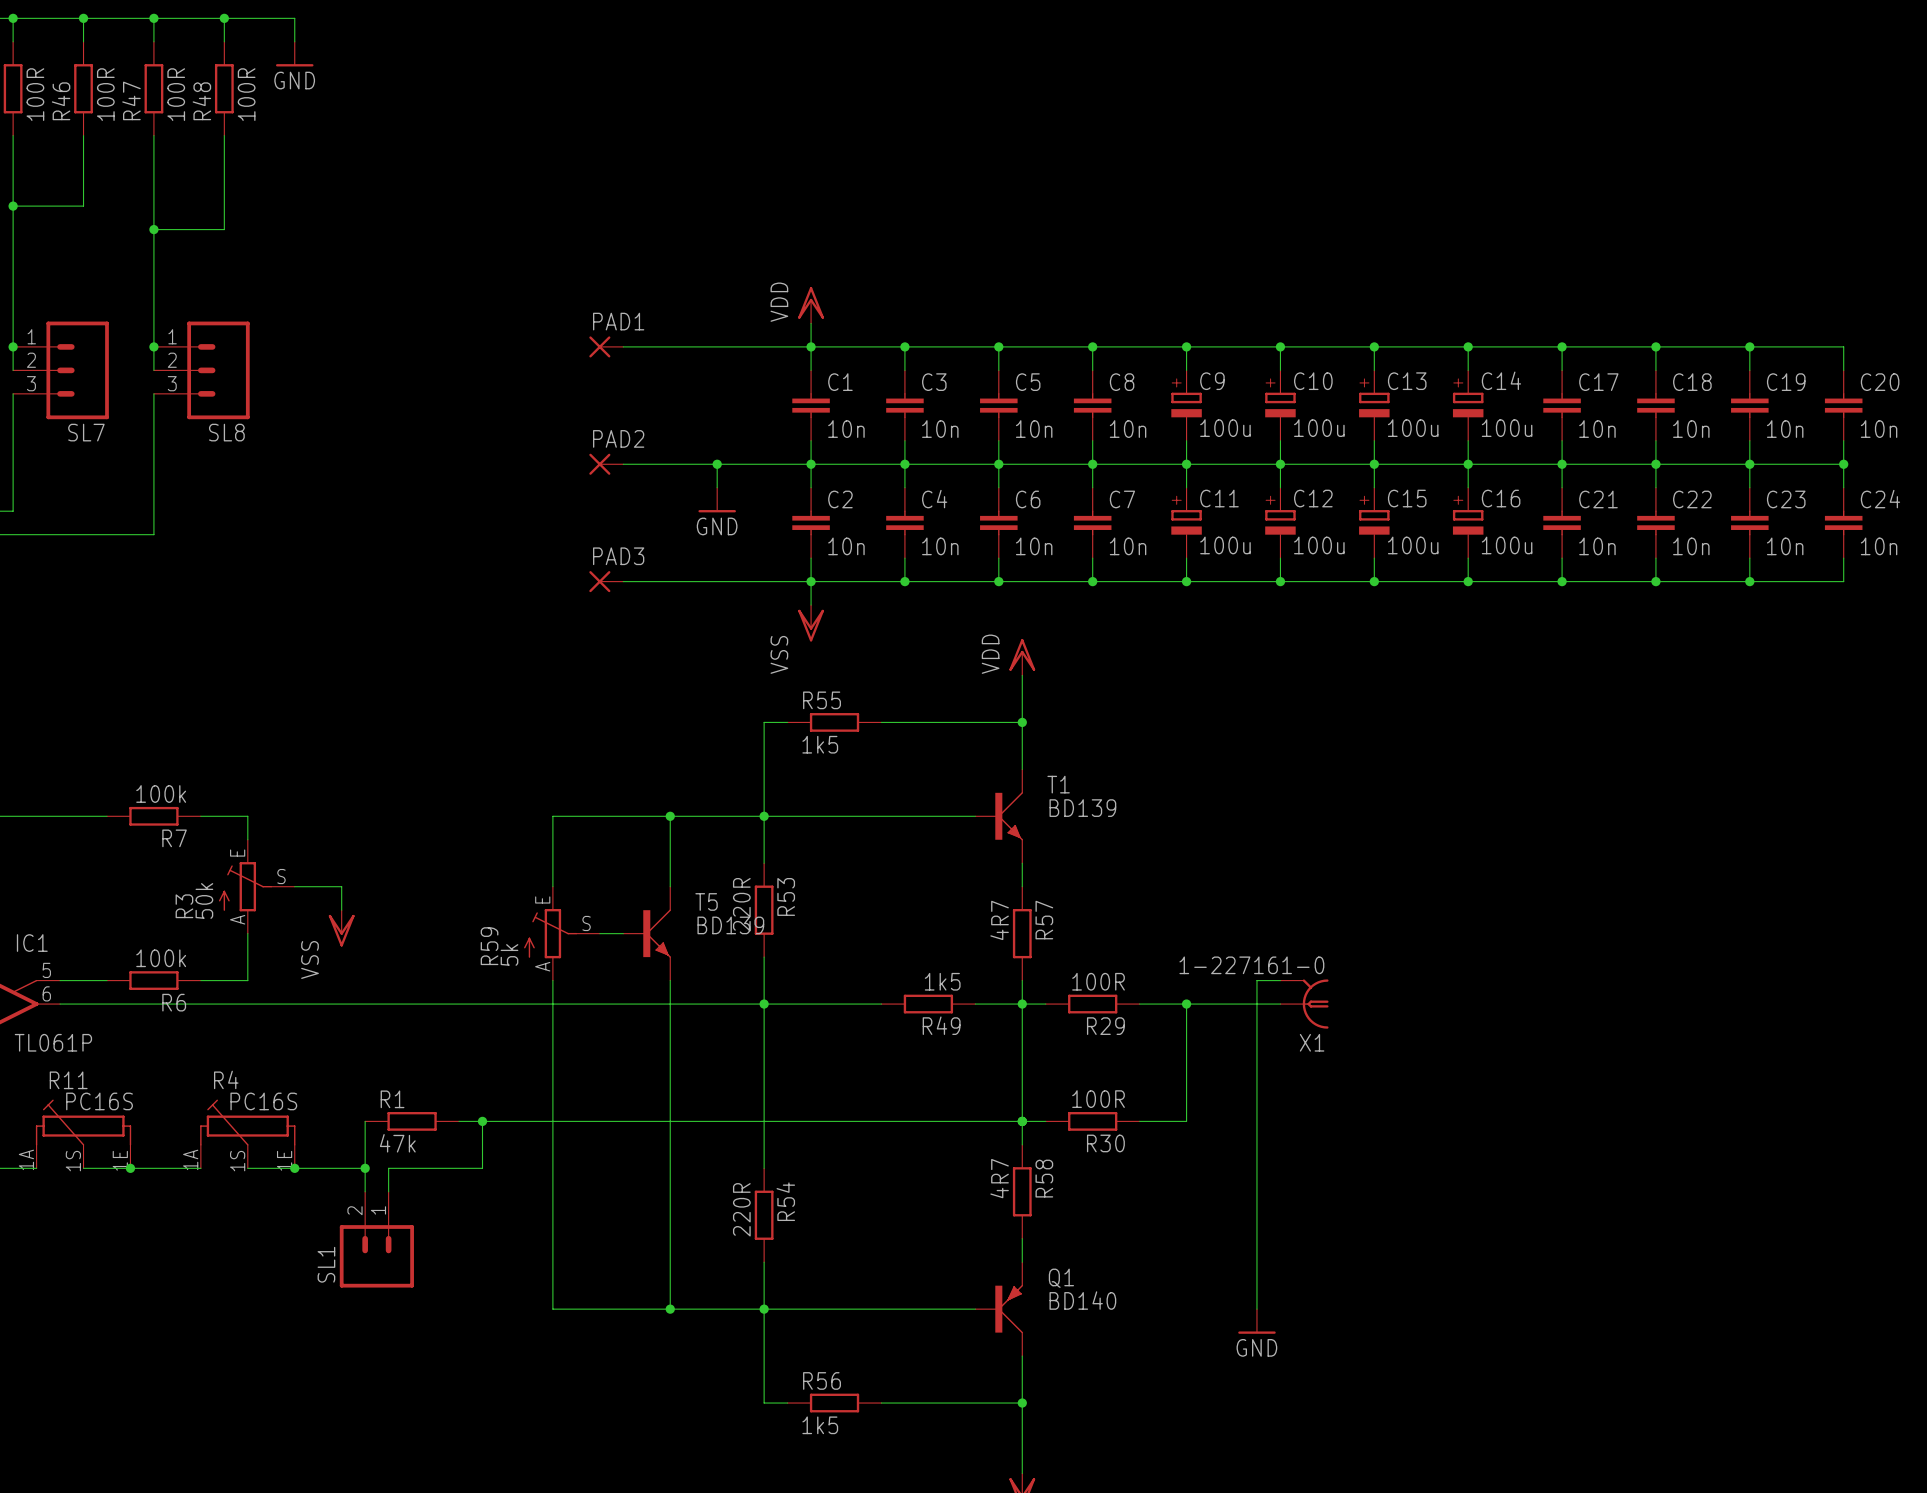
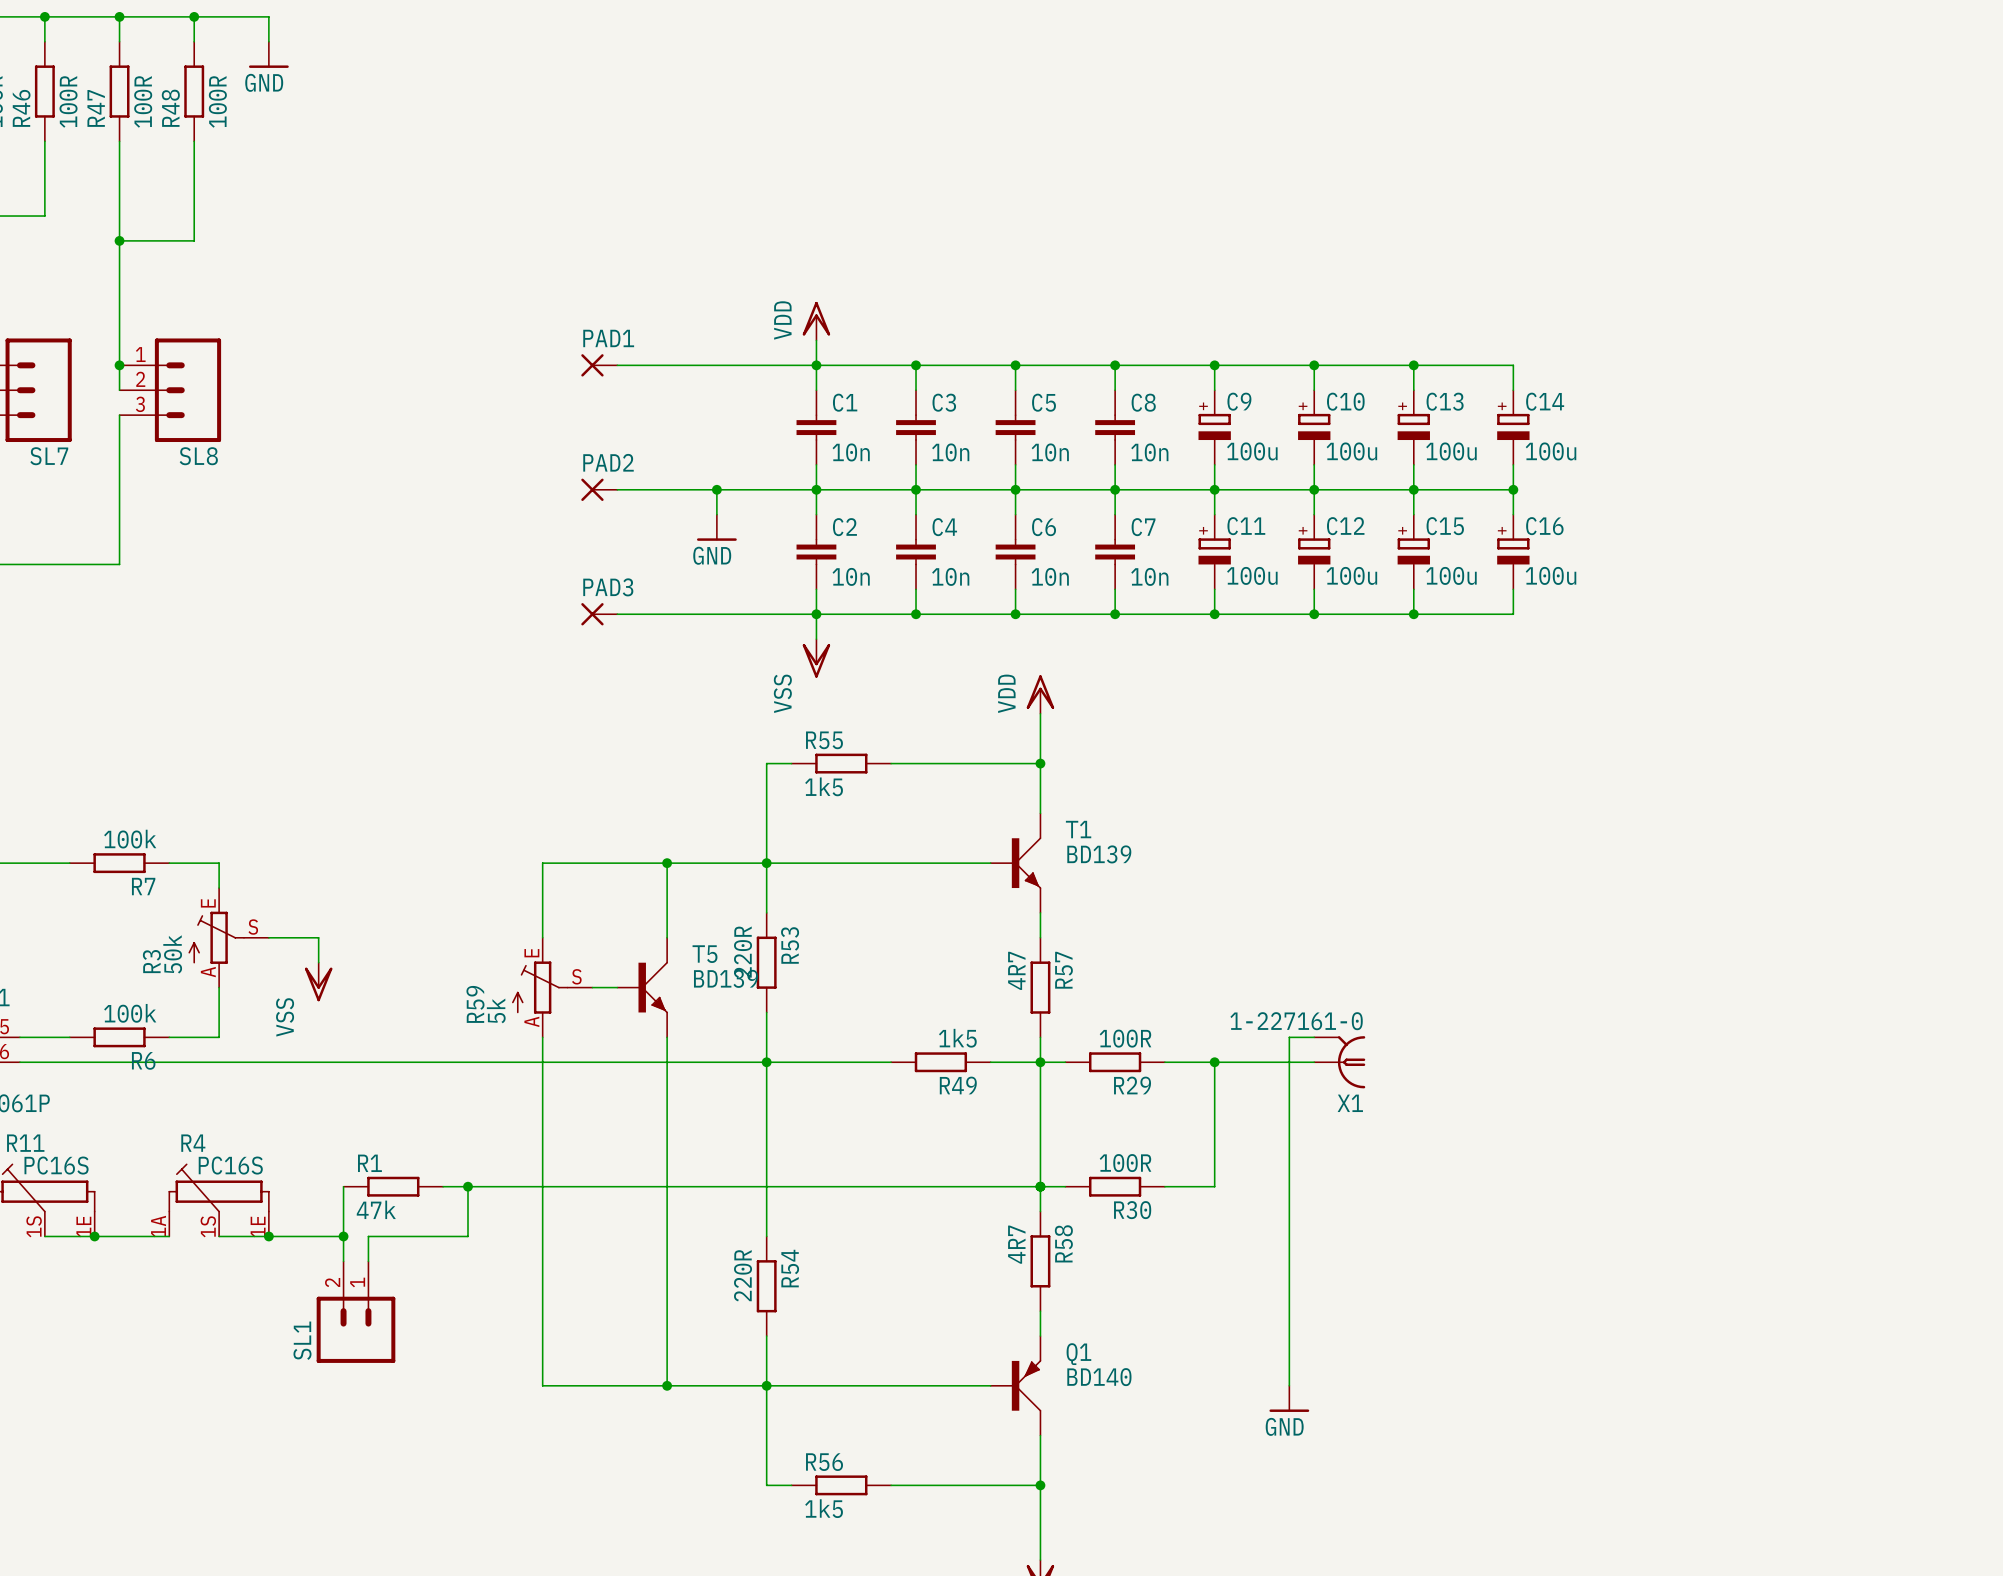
wire: (1468, 346) (1843, 346) (1843, 370) -> none
junction: (1468, 346) -> none
wire: (1562, 346) (1562, 370) -> none
junction: (1562, 346) -> none
wire: (1655, 346) (1655, 370) -> none
junction: (1655, 346) -> none
wire: (1749, 346) (1749, 370) -> none
junction: (1749, 346) -> none
C17: 10n (1562, 405) -> none
C18: 10n (1655, 405) -> none
C19: 10n (1749, 405) -> none
C20: 10n (1843, 405) -> none
wire: (1562, 440) (1562, 487) -> none
wire: (1655, 440) (1655, 487) -> none
wire: (1749, 440) (1749, 487) -> none
wire: (1843, 440) (1843, 487) -> none
wire: (1468, 464) (1843, 464) -> none
junction: (1562, 464) -> none
junction: (1655, 464) -> none
junction: (1749, 464) -> none
junction: (1843, 464) -> none
C21: 10n (1562, 522) -> none
C22: 10n (1655, 522) -> none
C23: 10n (1749, 522) -> none
C24: 10n (1843, 522) -> none
wire: (1562, 558) (1562, 581) -> none
wire: (1655, 558) (1655, 581) -> none
wire: (1749, 558) (1749, 581) -> none
wire: (1843, 558) (1843, 581) (1468, 581) -> none
junction: (1468, 581) -> none
junction: (1562, 581) -> none
junction: (1655, 581) -> none
junction: (1749, 581) -> none

